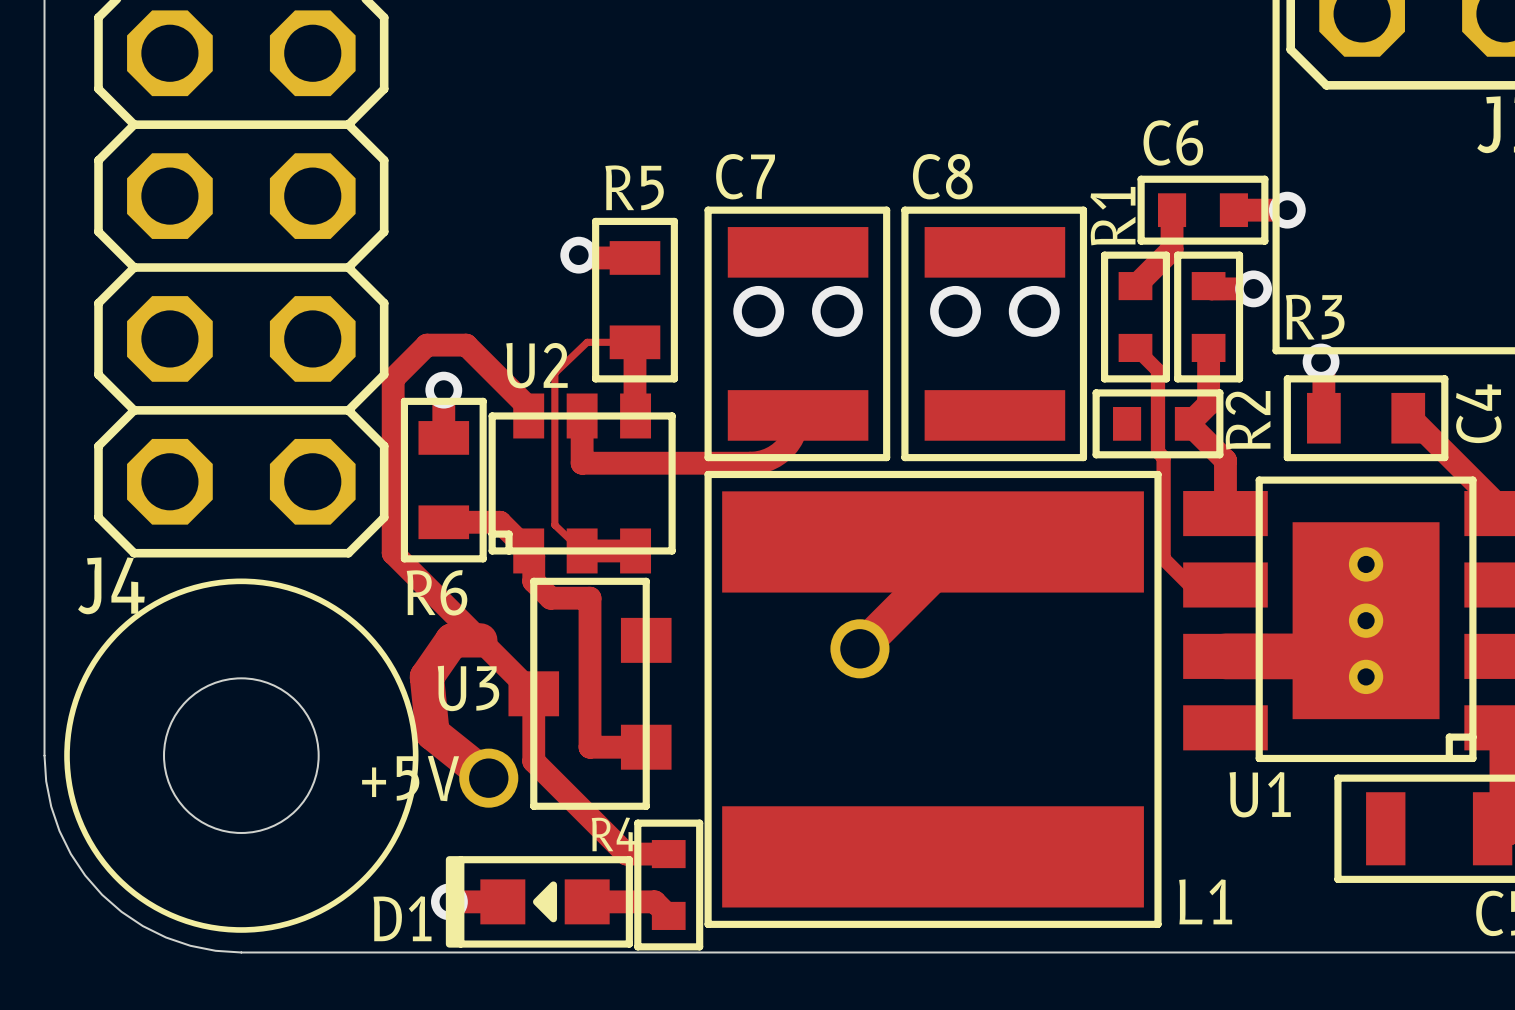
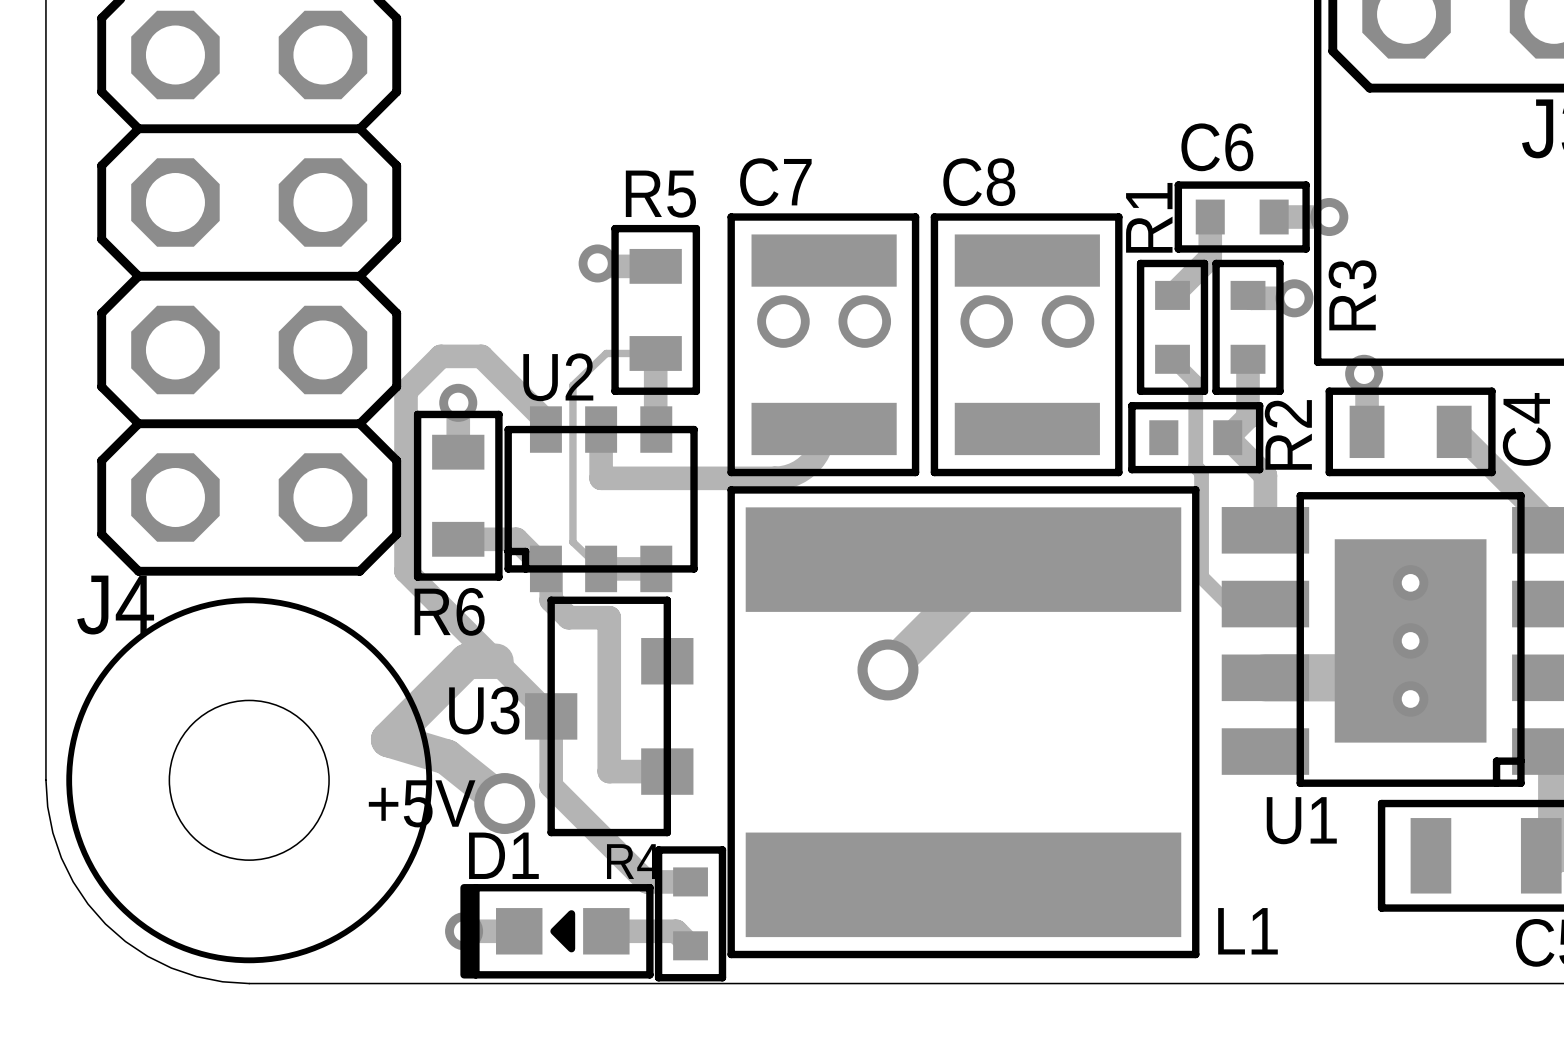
R3 name rotation: 0° (1315, 317) -> 90° counterclockwise (1352, 295)
track: (452, 640) (426, 676) (432, 733) -> (466, 661) (388, 739) (446, 757)
D1 name position: D1 (402, 918) -> D1 (503, 855)

